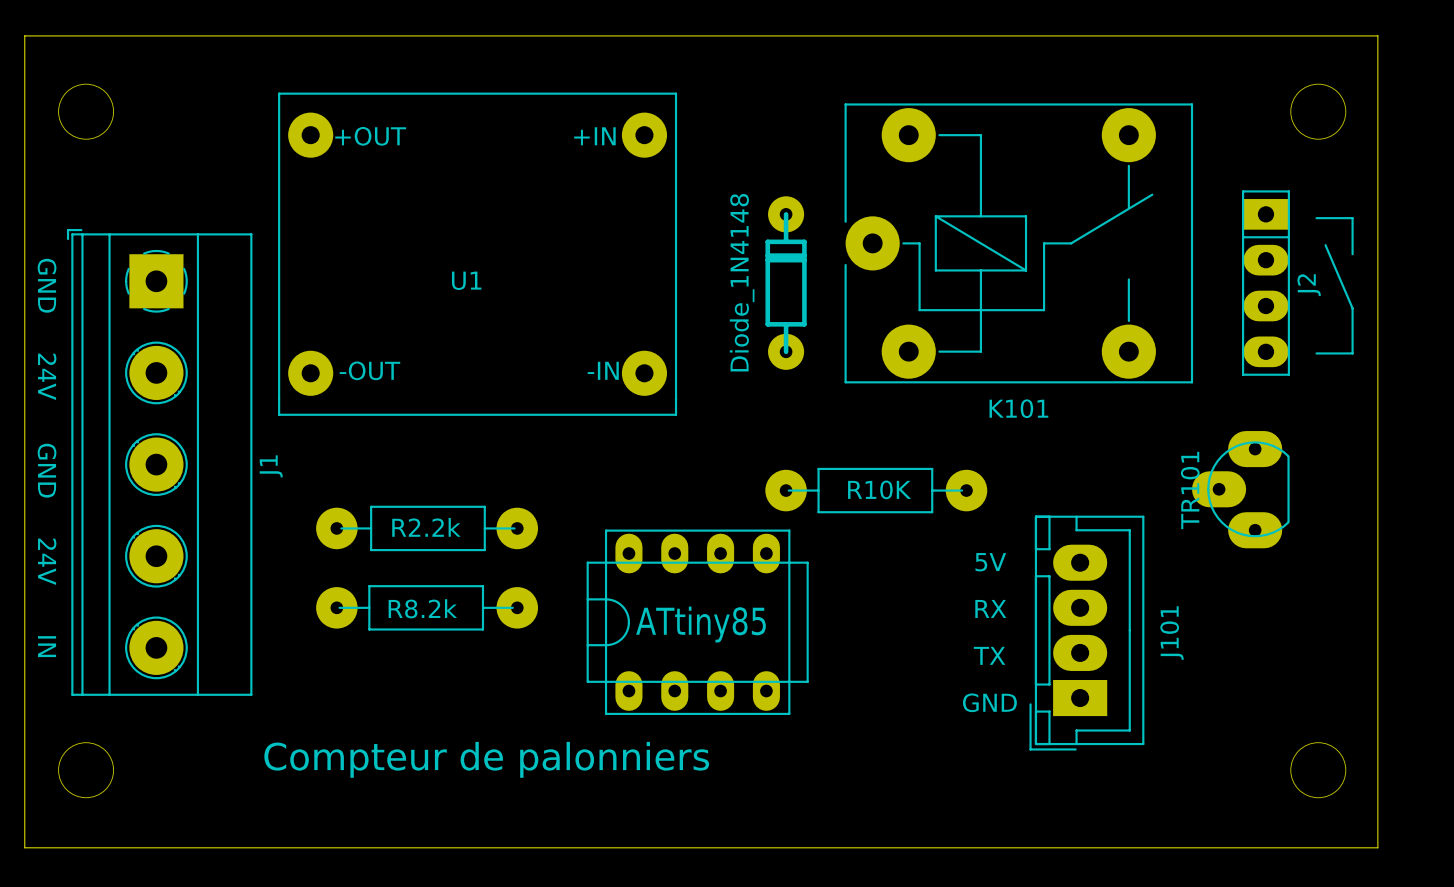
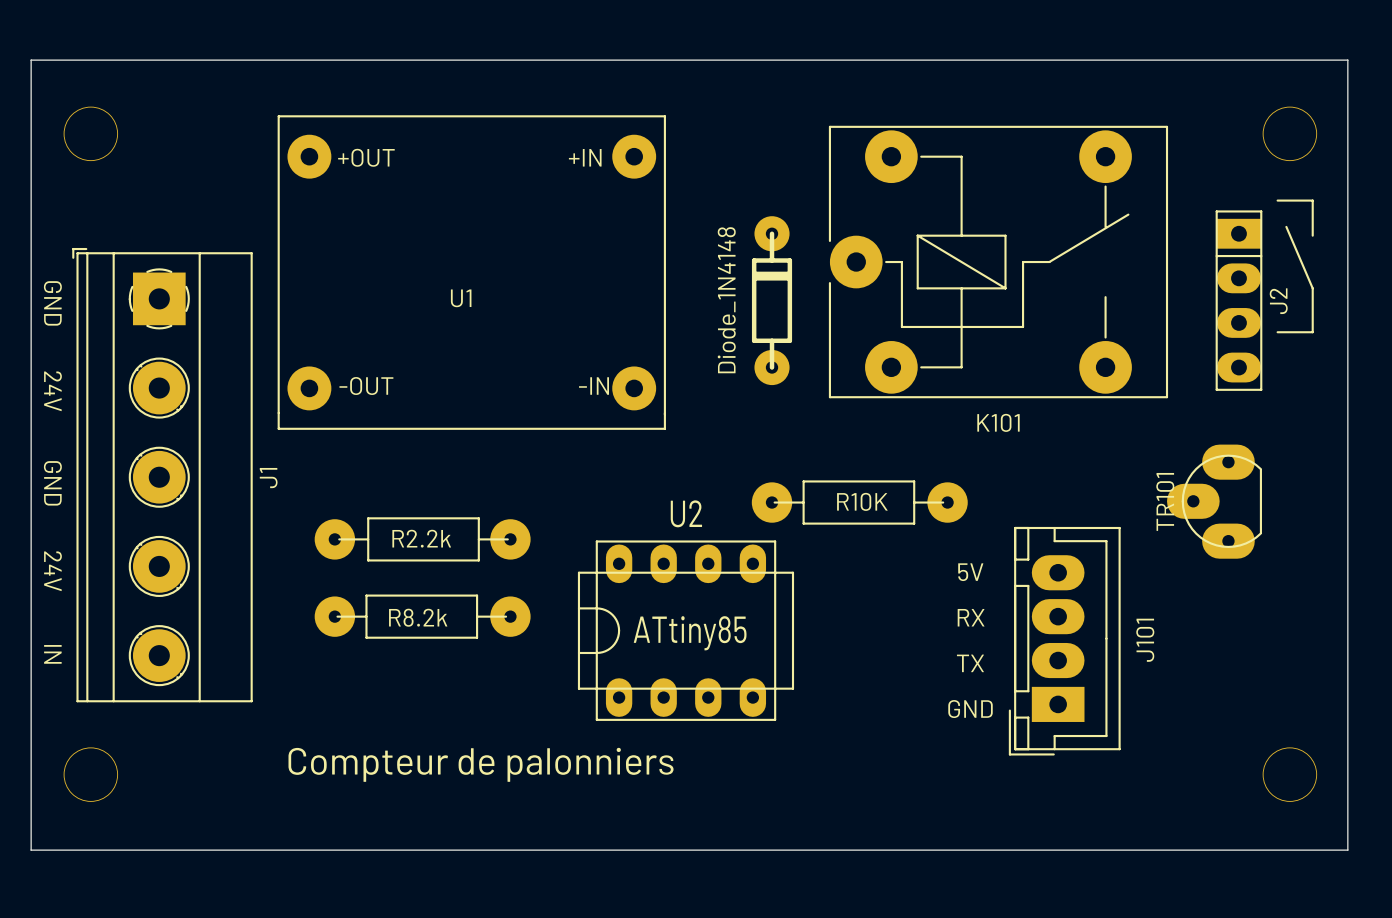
line: (1316, 218) (1352, 218) (1352, 254) -> (1277, 200) (1312, 200) (1312, 235)
line: (1325, 245) (1352, 308) (1352, 353) (1316, 353) -> (1286, 226) (1312, 288) (1312, 332) (1277, 332)
U2 name: none -> U2 (686, 513)

